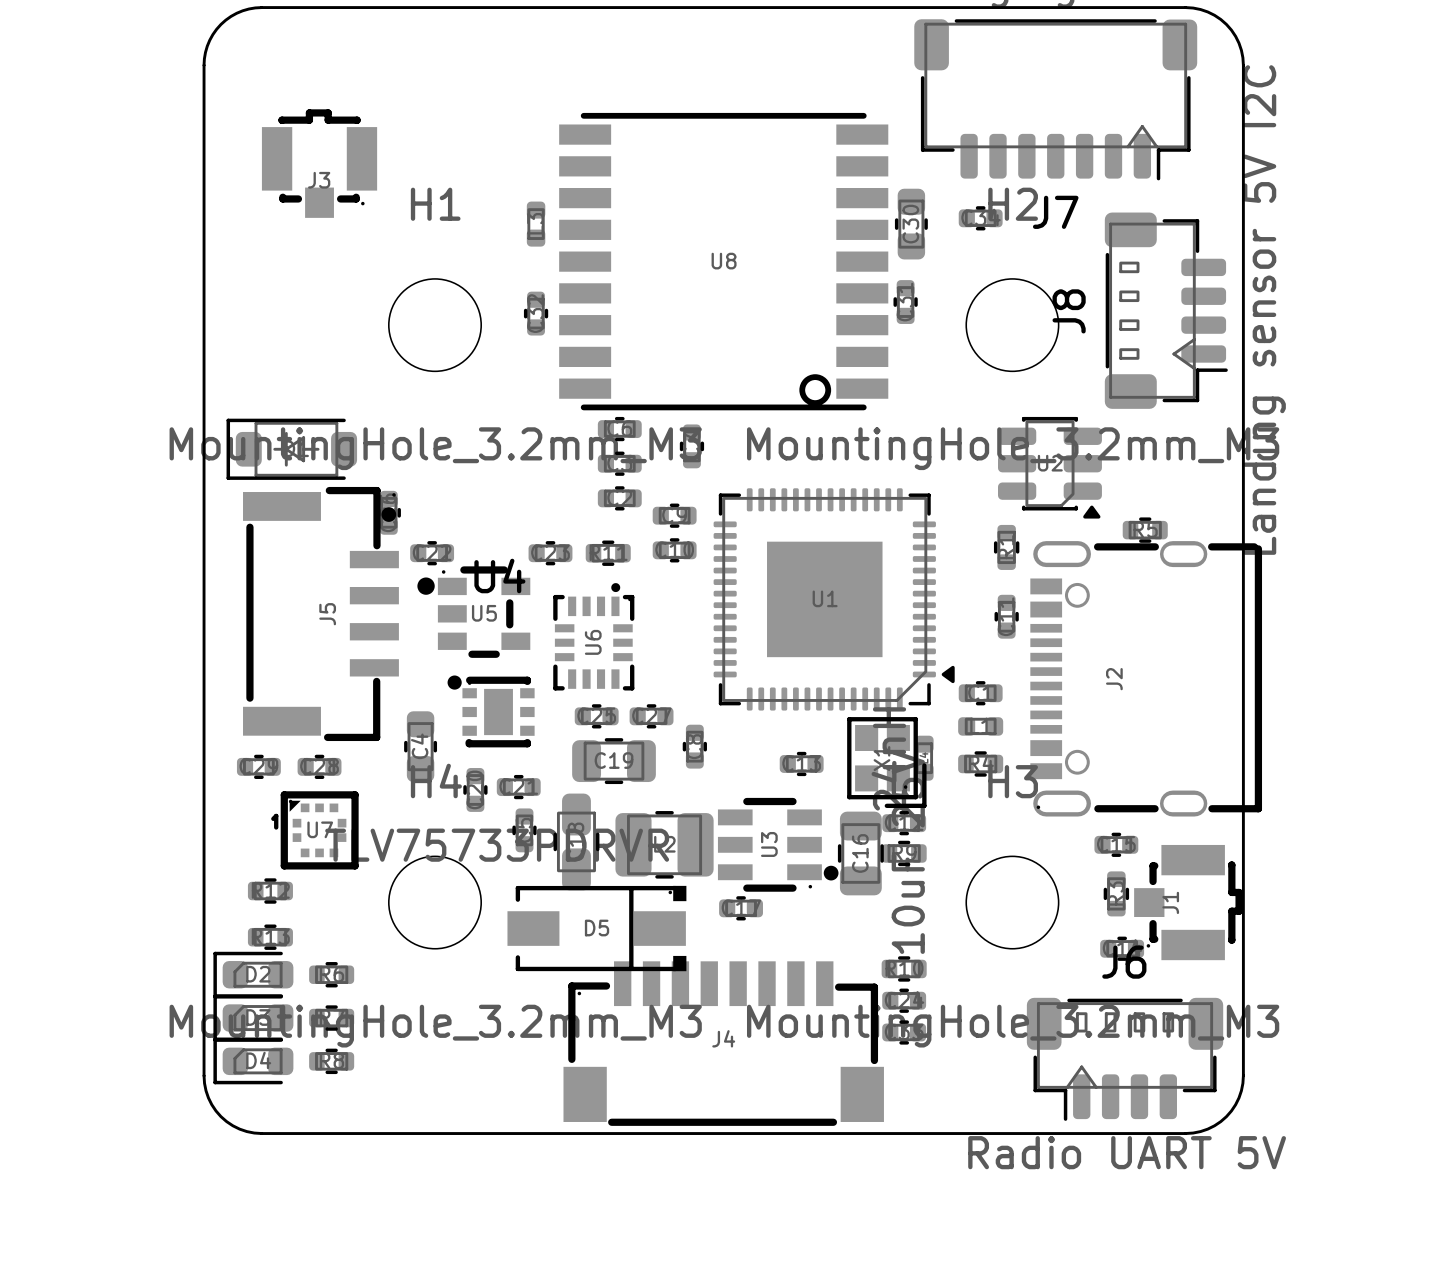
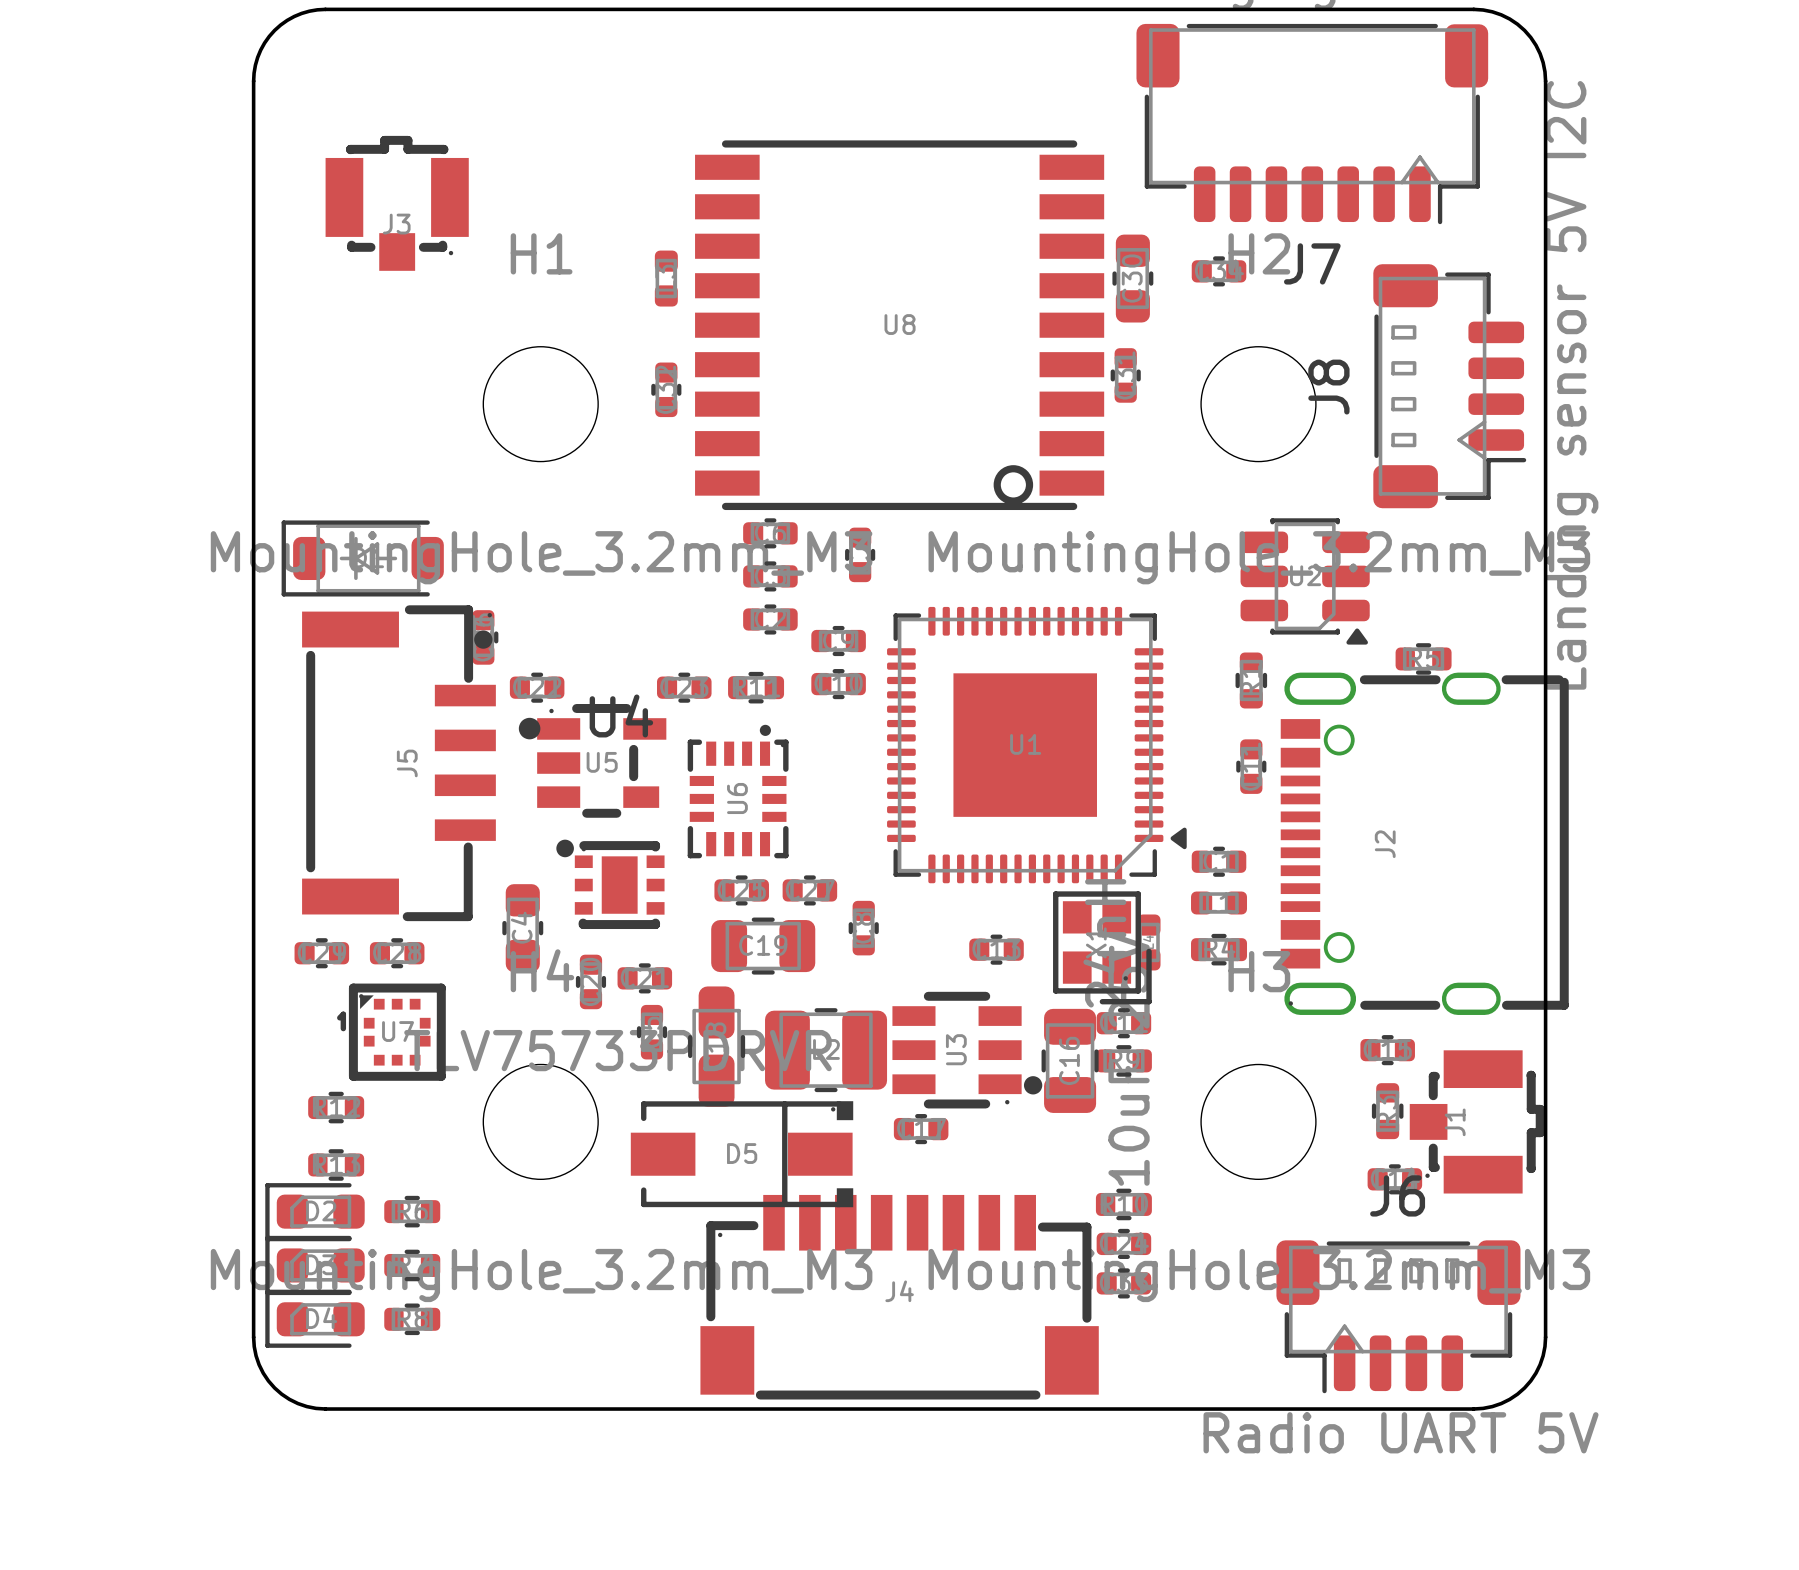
U5 footprint: [417, 566, 531, 658] -> [518, 704, 667, 818]

